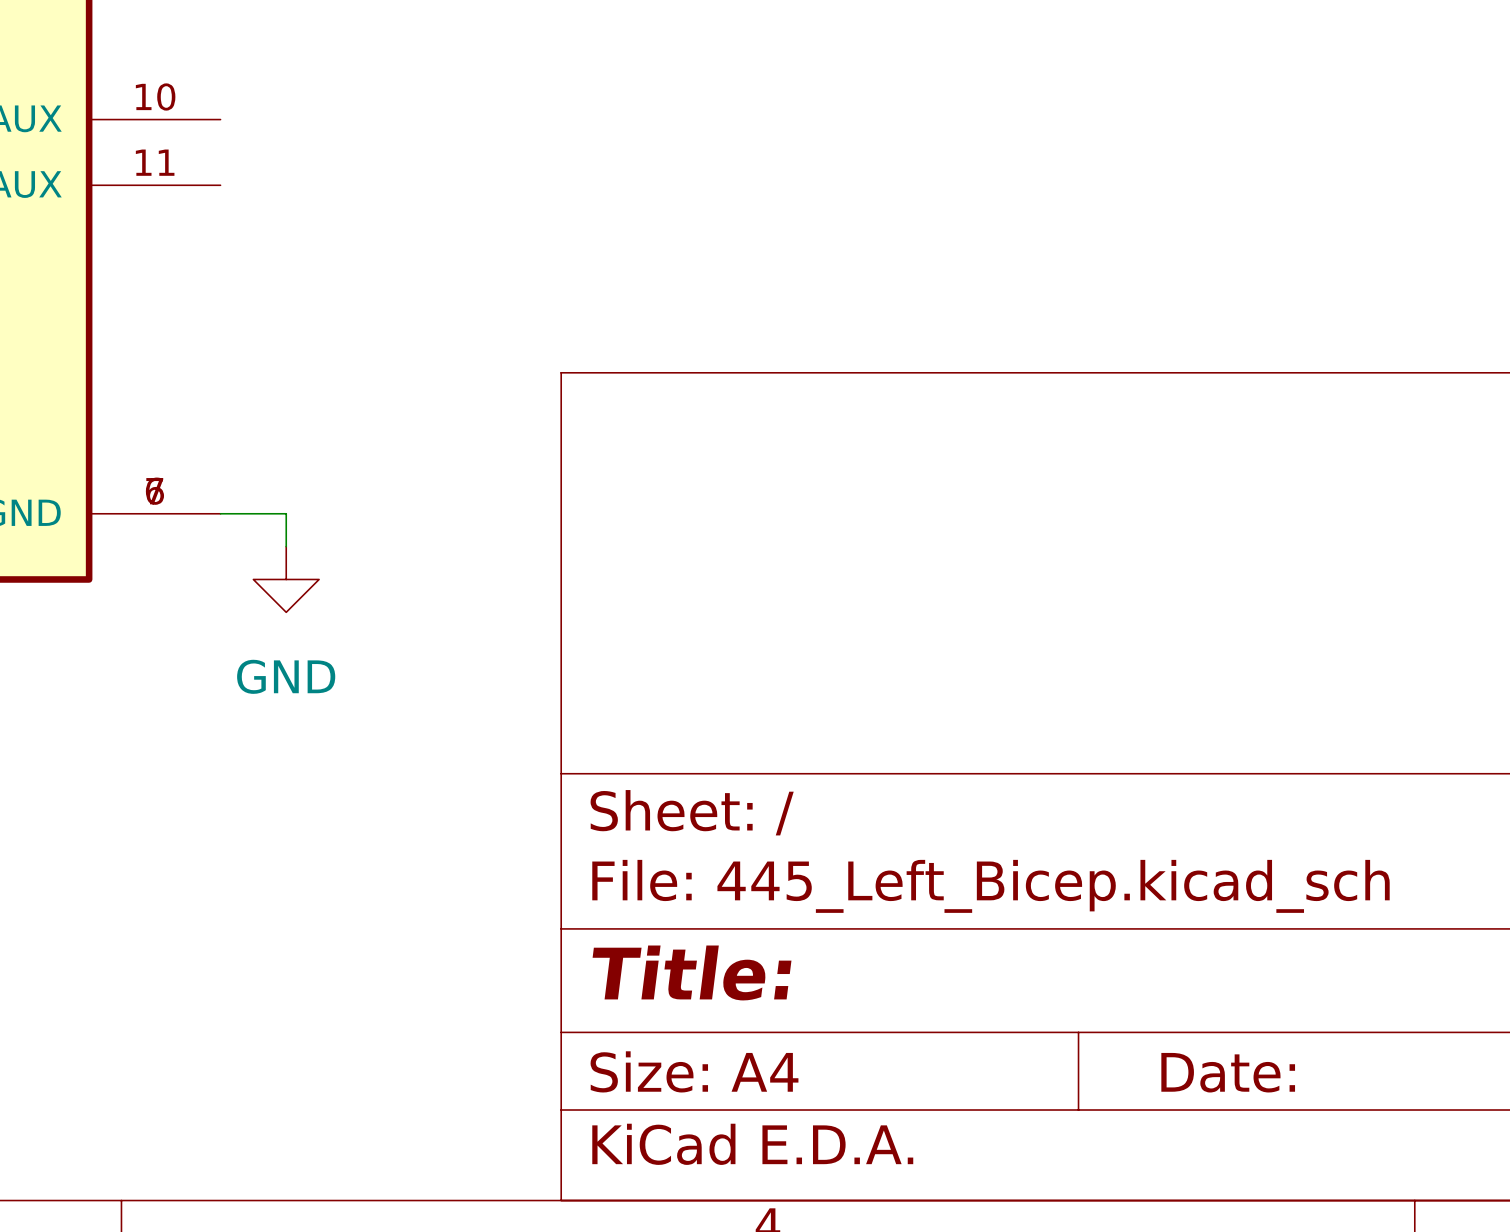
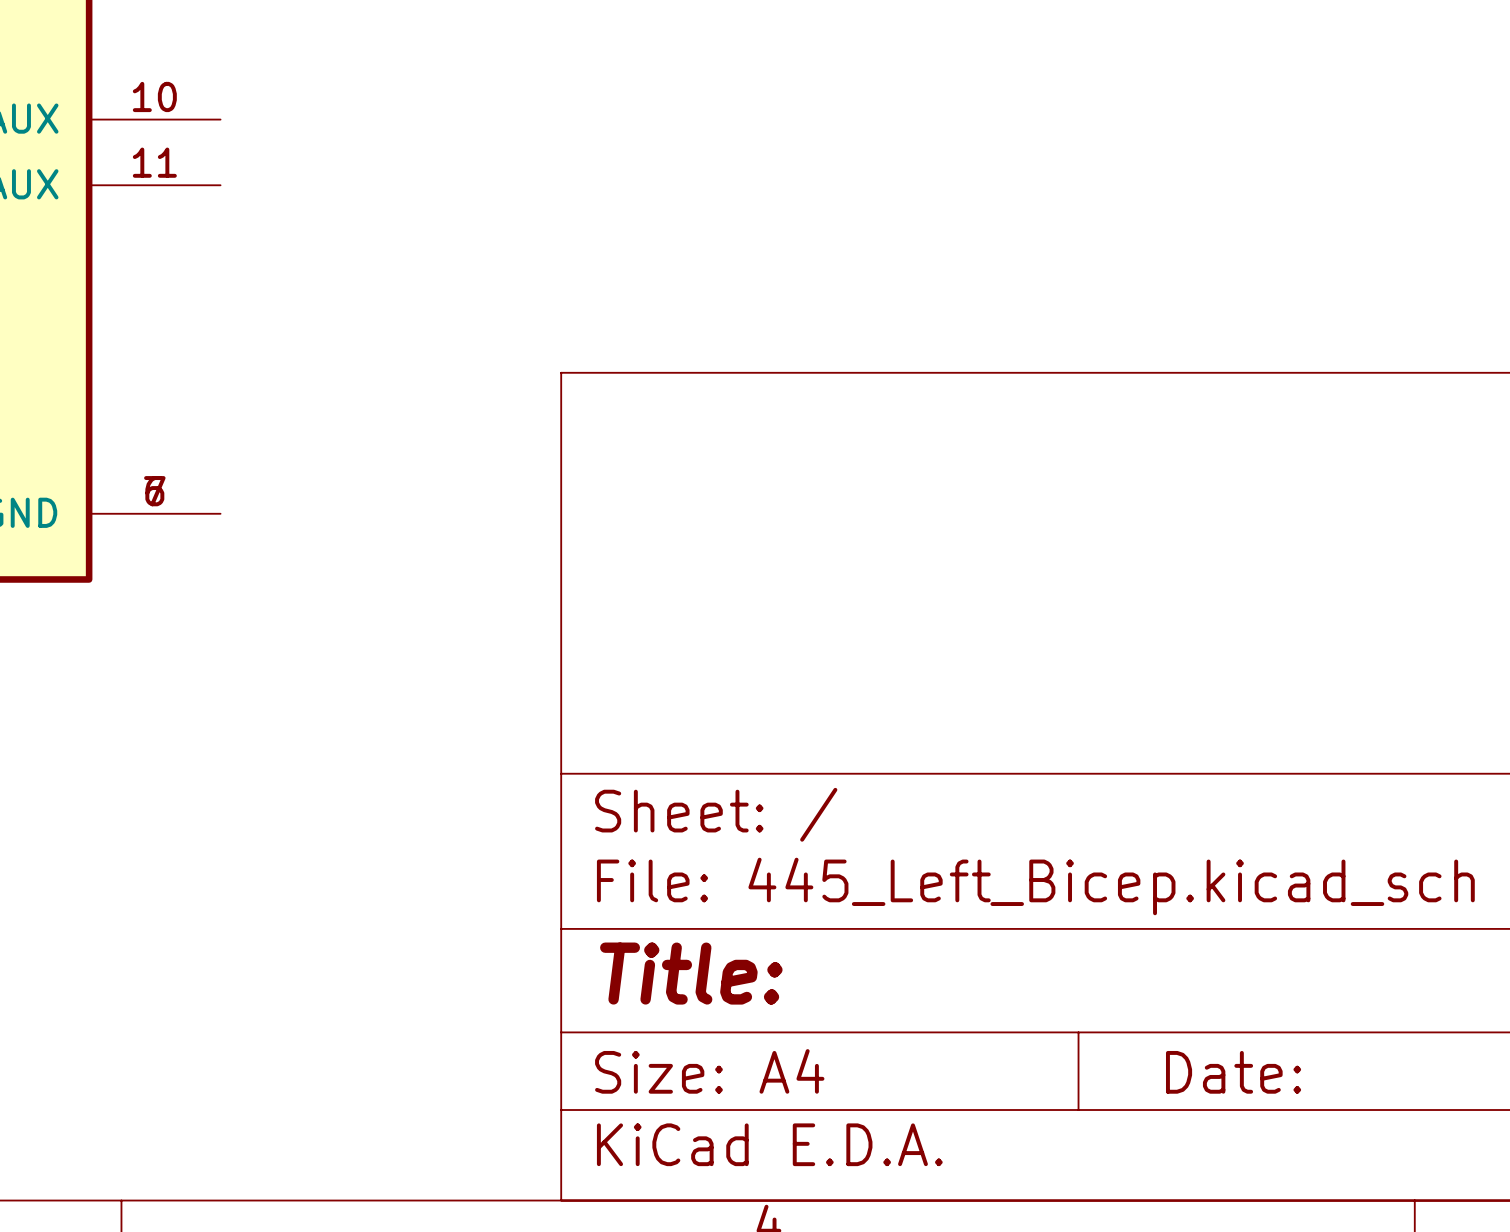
wire: (220, 513) (286, 513) (286, 546) -> none
power symbol: GND (286, 579) -> none

